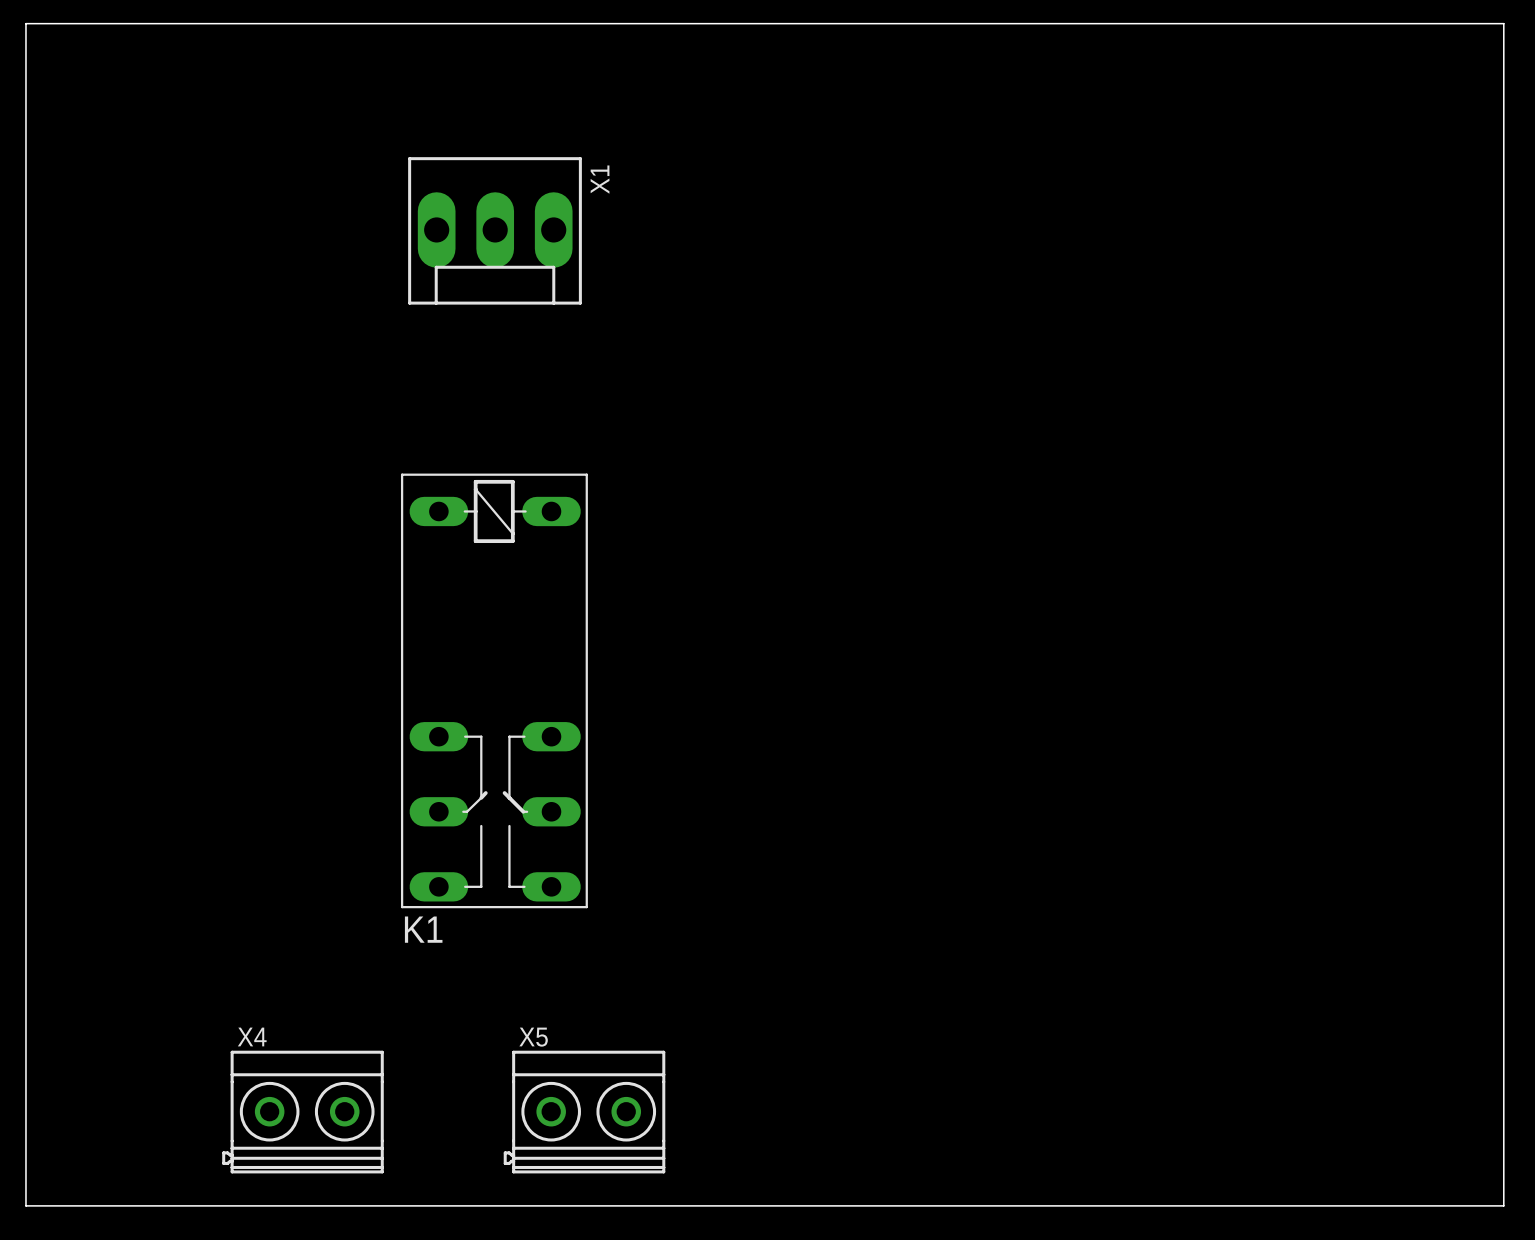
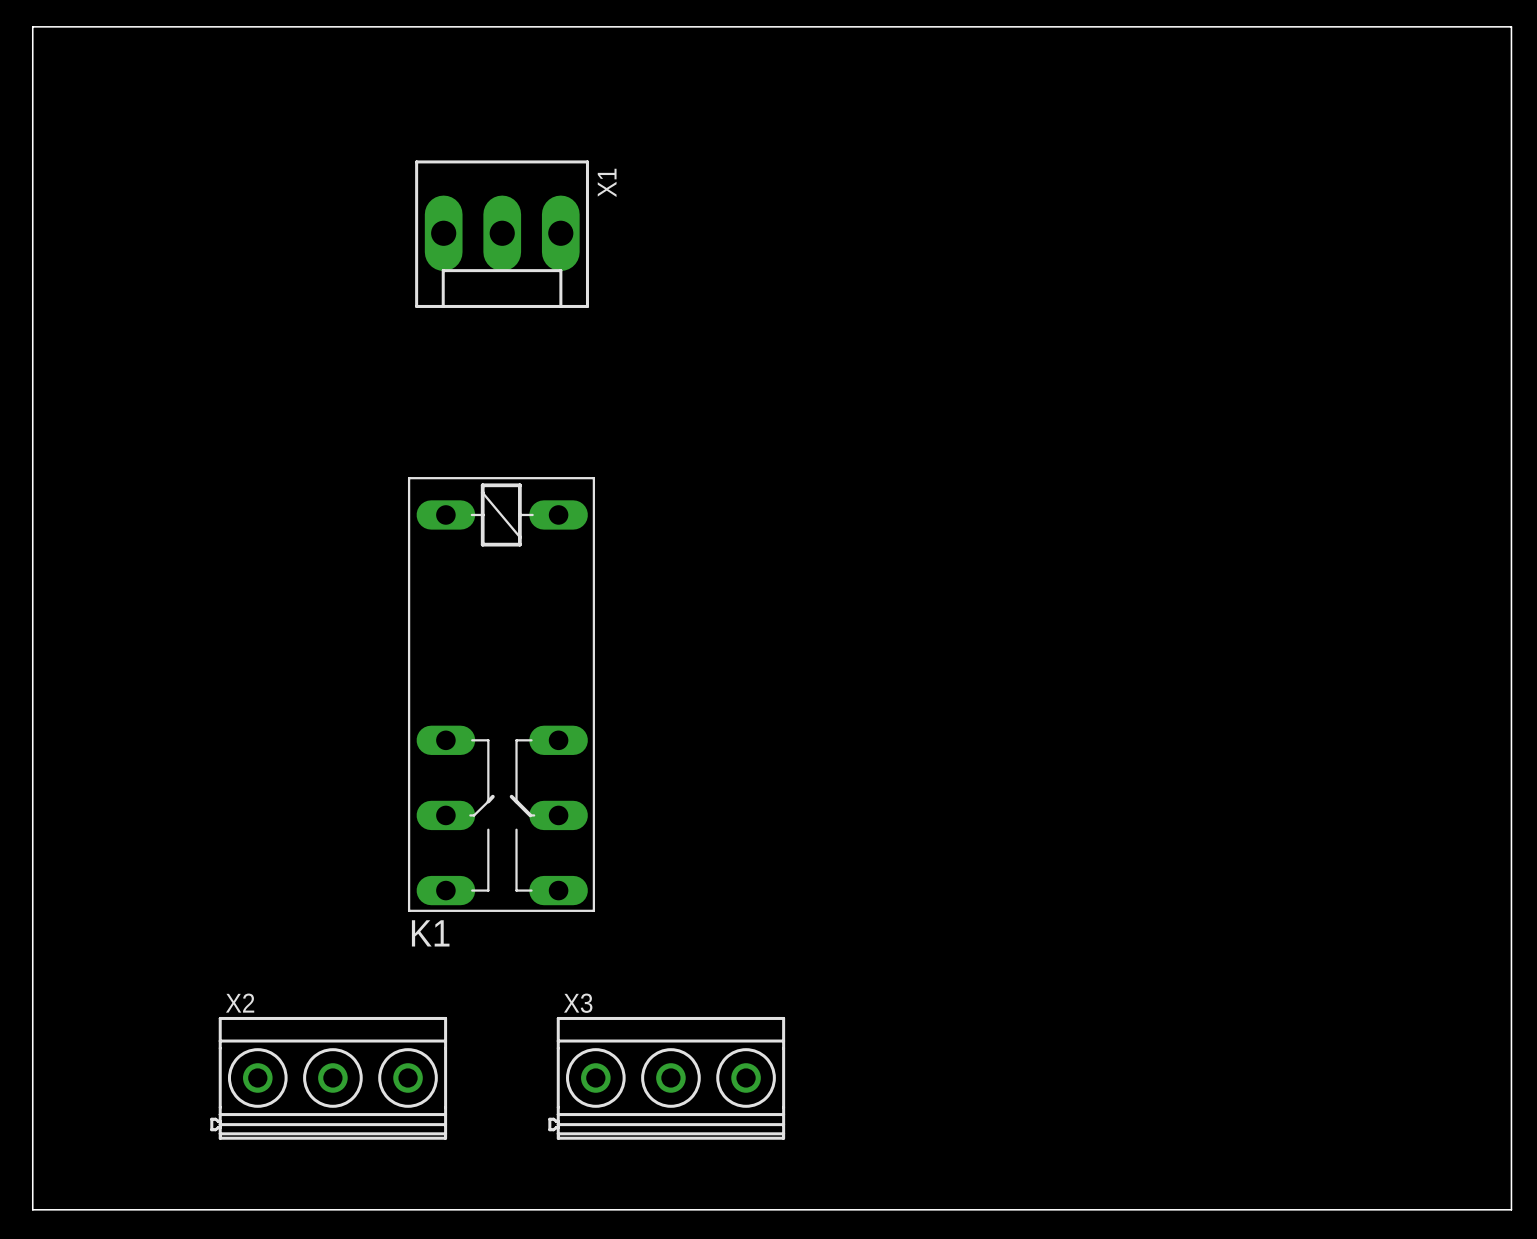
X2: none -> (328, 1078)
X3: none -> (666, 1078)
X4: (302, 1112) -> none
X5: (584, 1112) -> none

